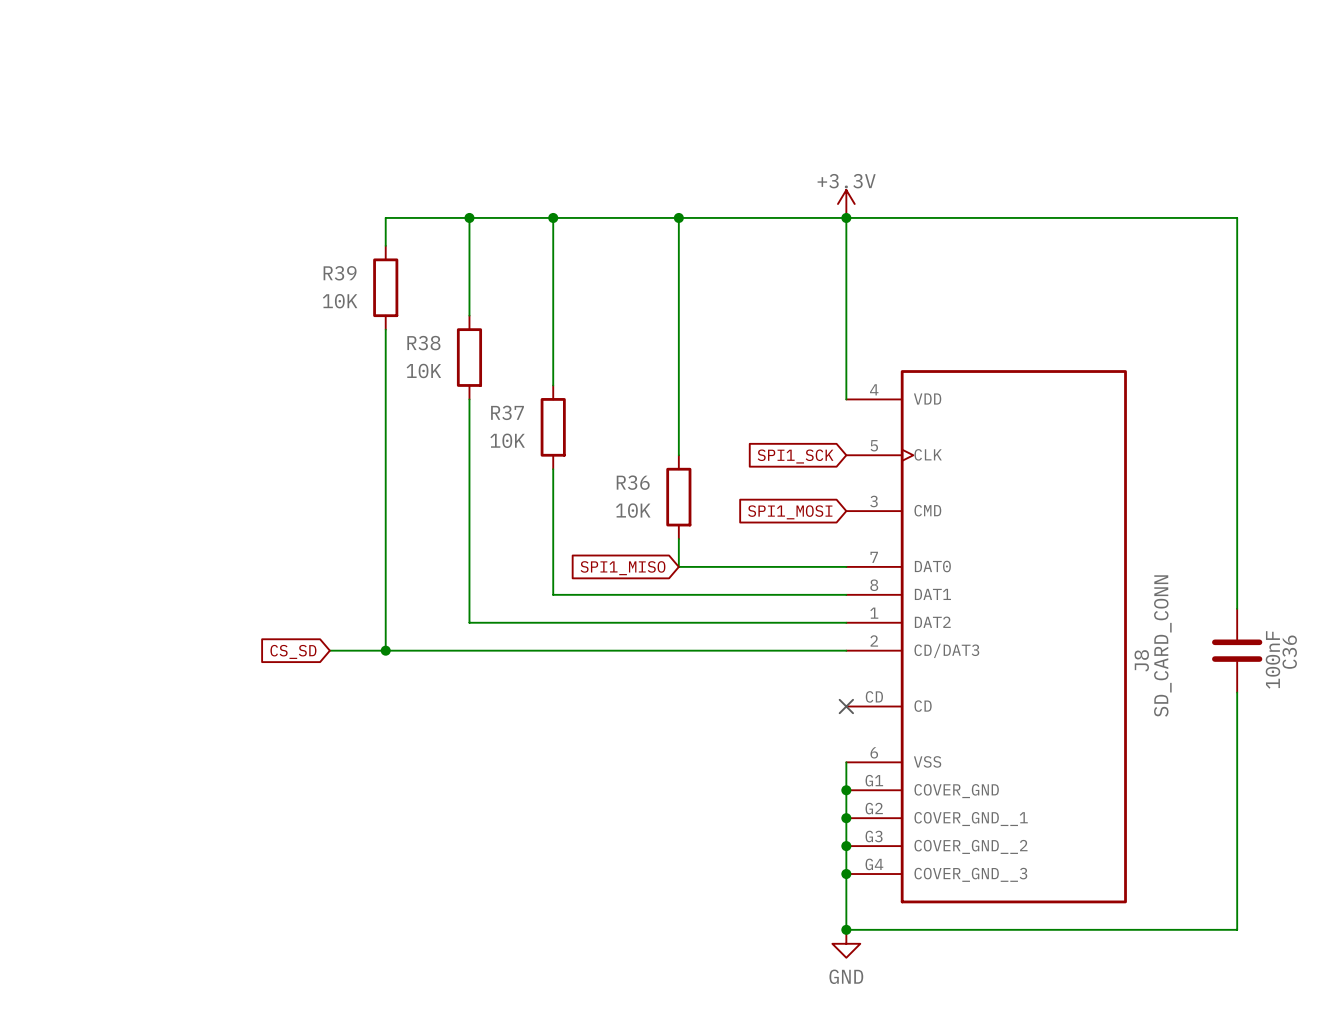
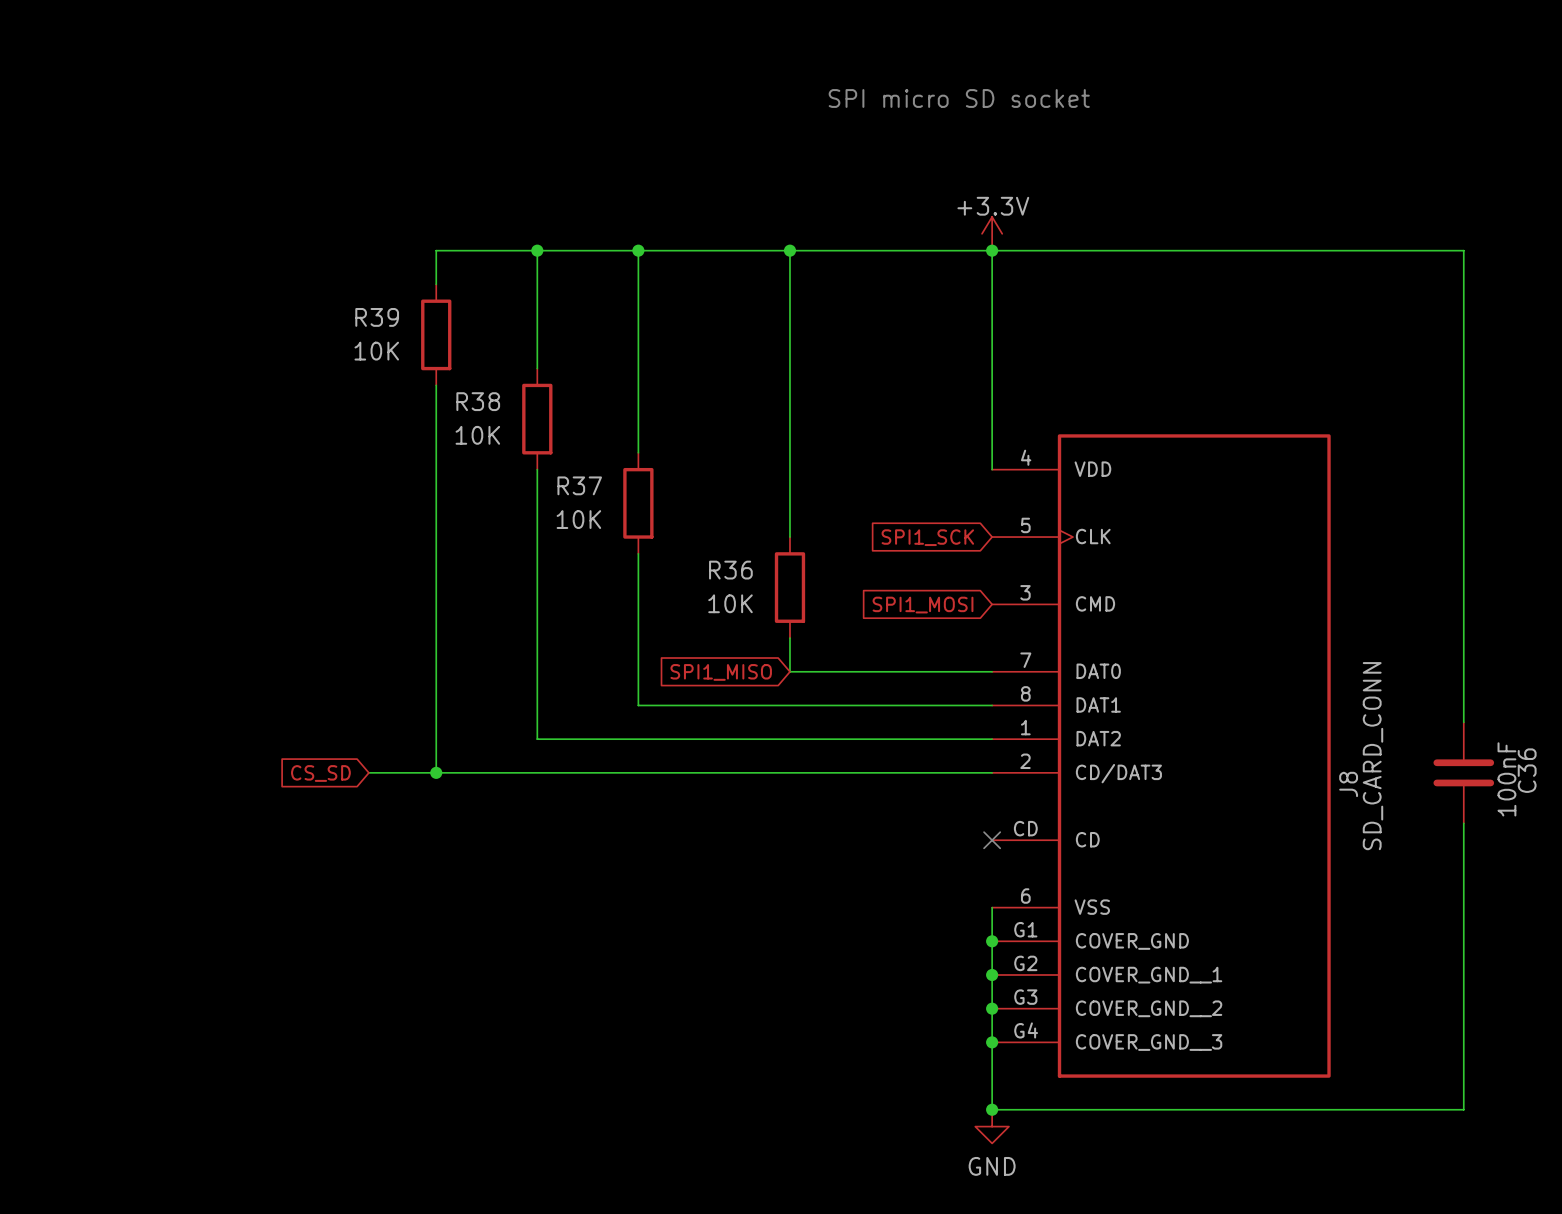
text: none -> SPI micro SD socket (959, 98)

